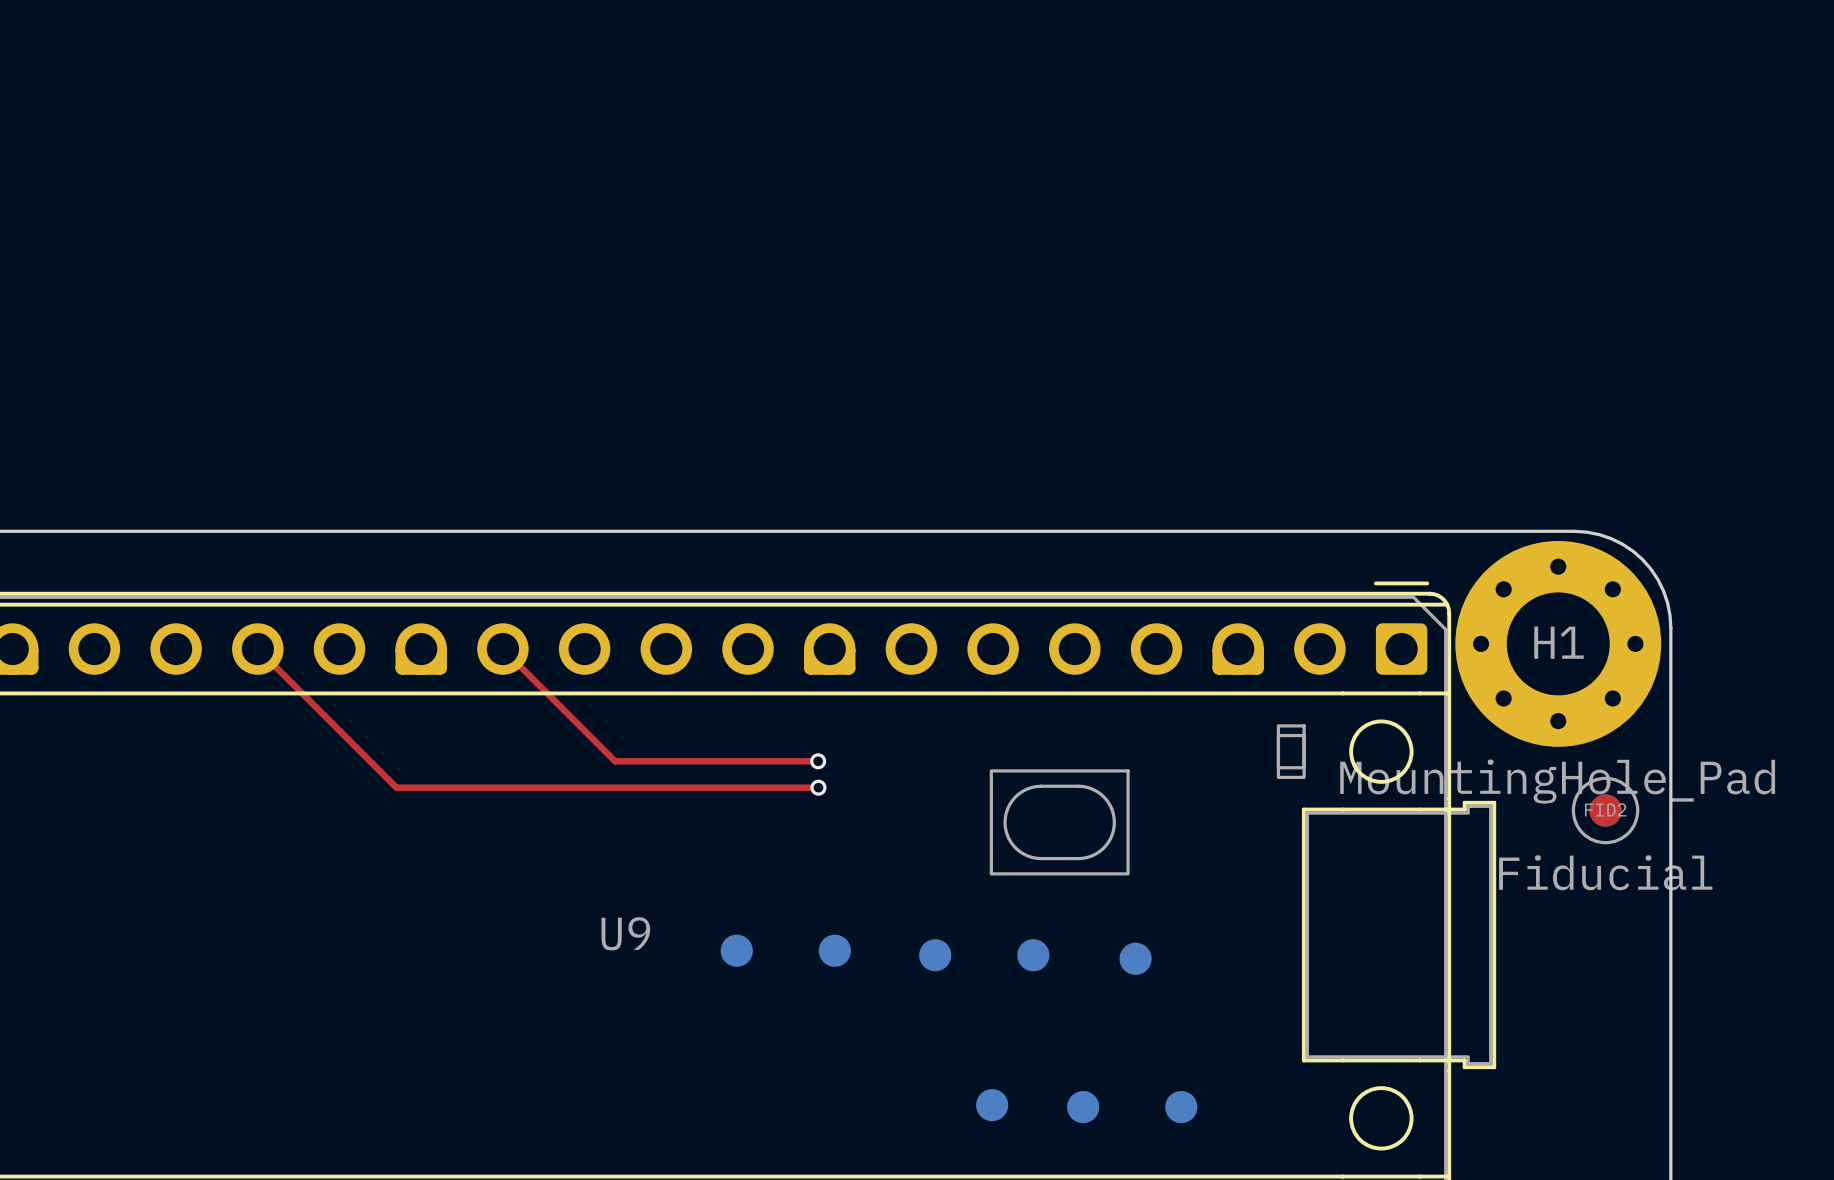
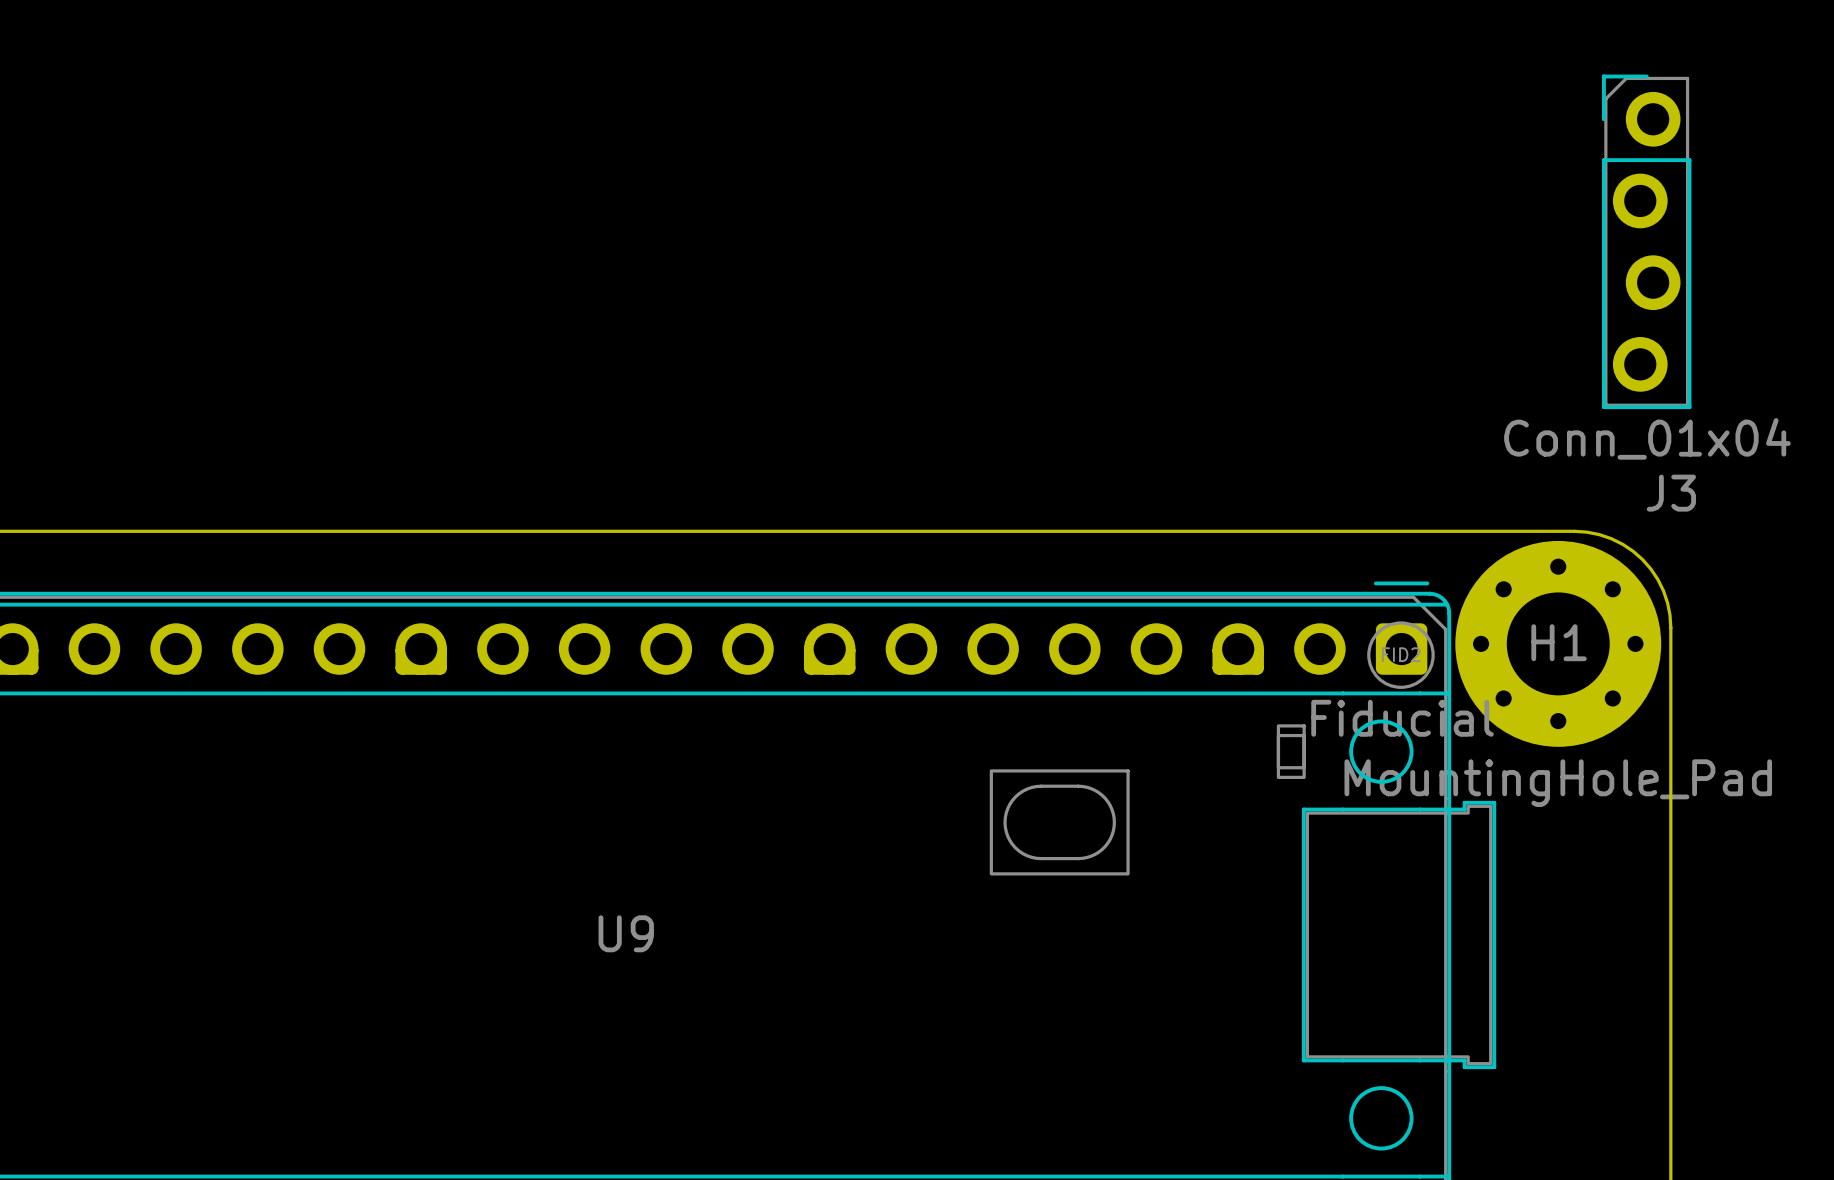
J3: none -> Conn_01x04 (1646, 241)
top track: (257, 649) (396, 787) (818, 787) -> none
top track: (502, 649) (615, 761) (818, 761) -> none
via: (818, 761) -> none
via: (818, 787) -> none
FID2 position: (1605, 810) -> (1400, 655)
part: (736, 950) -> none
part: (834, 950) -> none
part: (935, 955) -> none
part: (1033, 955) -> none
part: (1135, 958) -> none
part: (992, 1105) -> none
part: (1083, 1107) -> none
part: (1181, 1107) -> none

